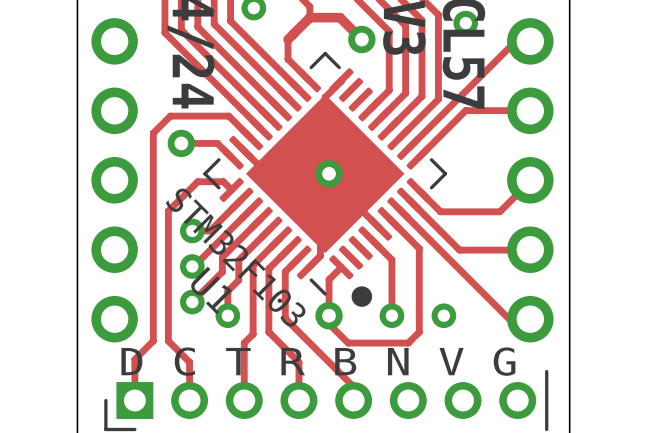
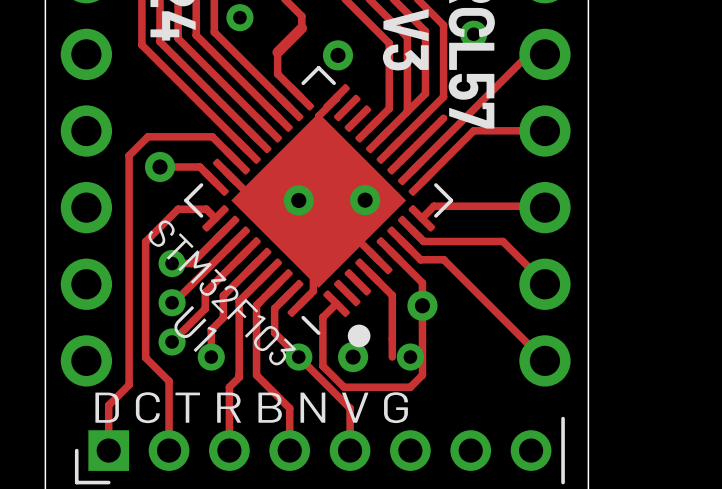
track: (309, 17) (339, 17) (361, 39) -> none
via position: (361, 39) -> (338, 55)
track: (422, 76) (422, 96) -> (425, 93) (407, 111)
track: (438, 79) (438, 99) -> (443, 96) (425, 115)
via position: (329, 173) -> (298, 200)
via: none -> (365, 200)
track: (531, 180) (499, 211) (440, 211) (418, 189) -> (546, 207) (434, 206) (421, 218)
track: (420, 210) (459, 250) (529, 250) -> (423, 241) (502, 241) (544, 284)
track: (417, 227) (509, 319) (530, 319) -> (420, 259) (443, 259) (544, 360)
via: none -> (422, 305)
track: (285, 293) (285, 318) (353, 386) -> (274, 332) (350, 408) (350, 435)
via: none -> (298, 357)
via position: (329, 315) -> (353, 357)
via position: (391, 315) -> (410, 357)
via: (443, 315) -> none
track: (168, 316) (168, 341) (189, 362) -> (145, 357) (169, 381) (169, 408)

